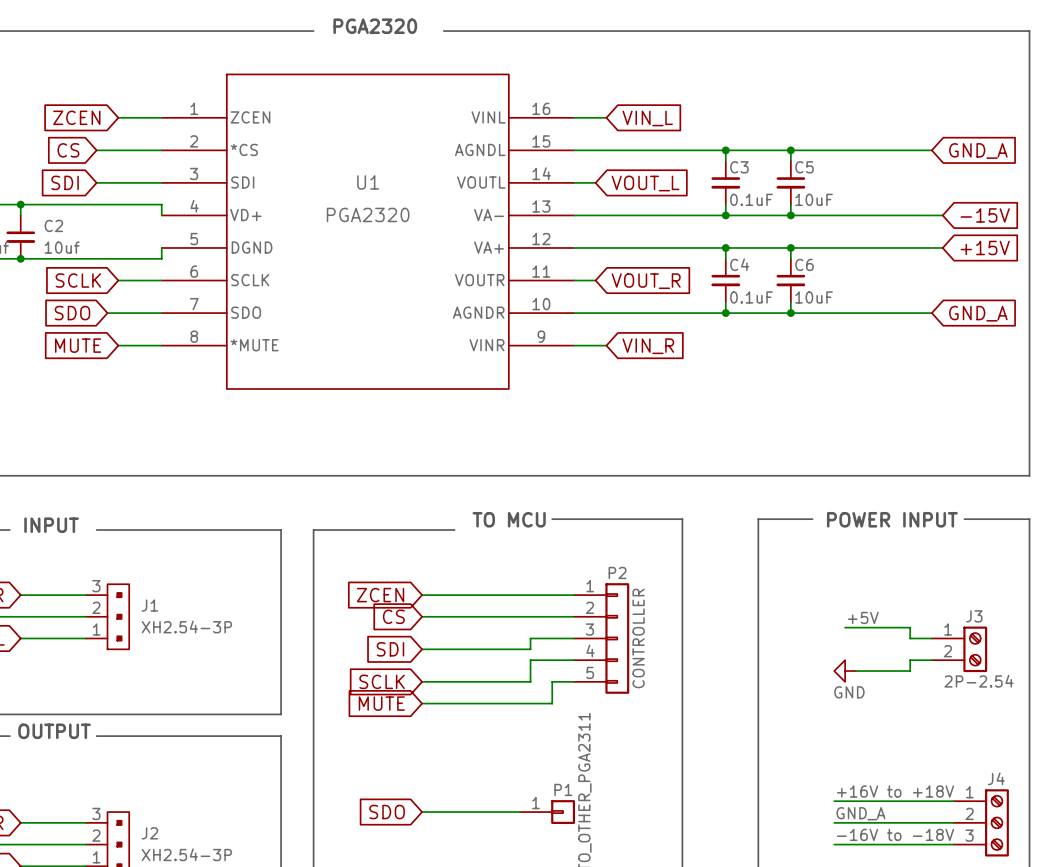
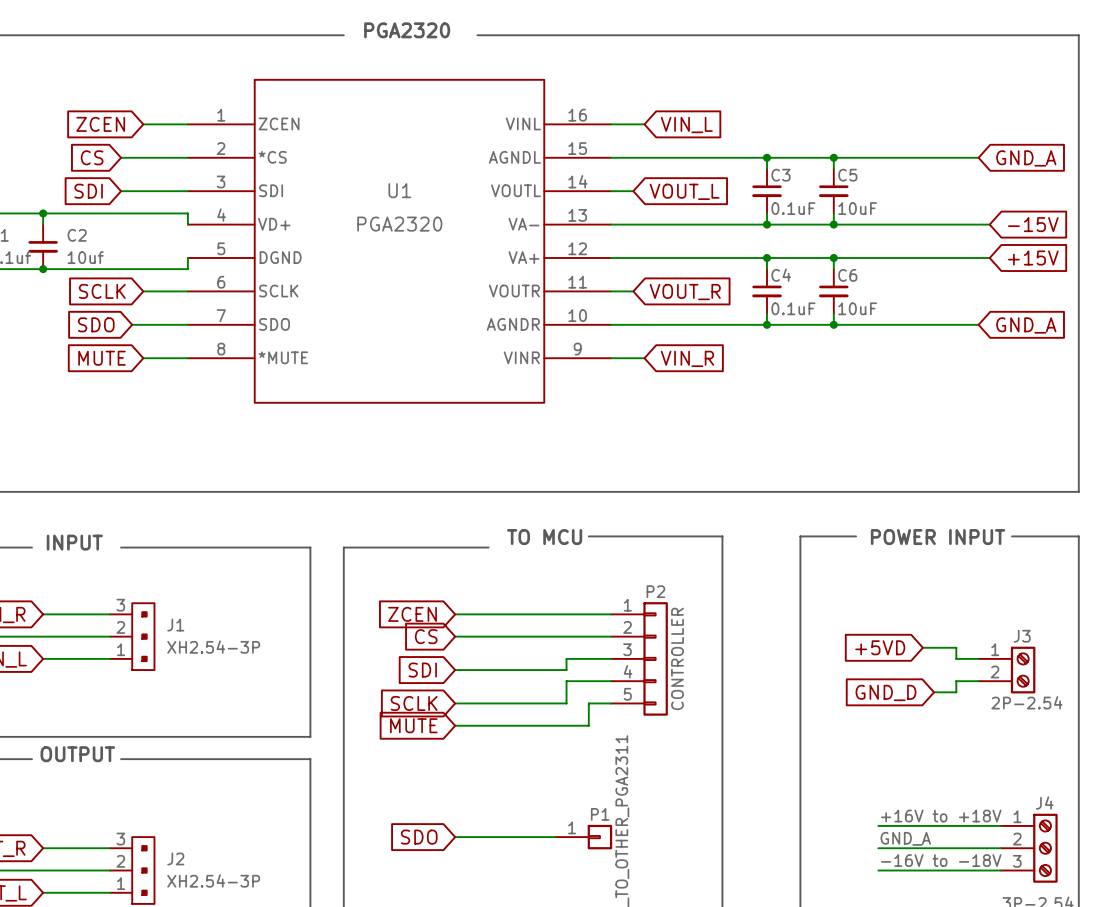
label: +5V (863, 617) -> none
global label: none -> +5VD (880, 647)
wire: (845, 627) (877, 627) -> none
global label: none -> GND_D (885, 692)
power symbol: GND (845, 671) -> none
wire: (855, 671) (888, 671) -> none

